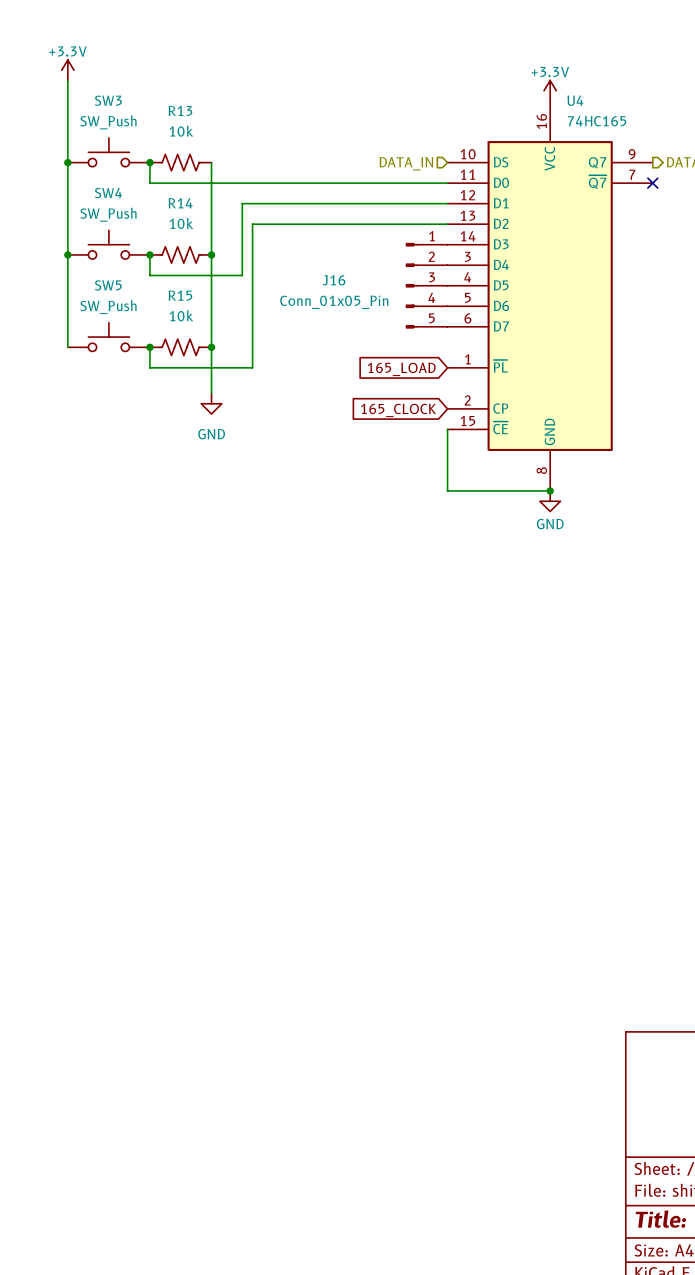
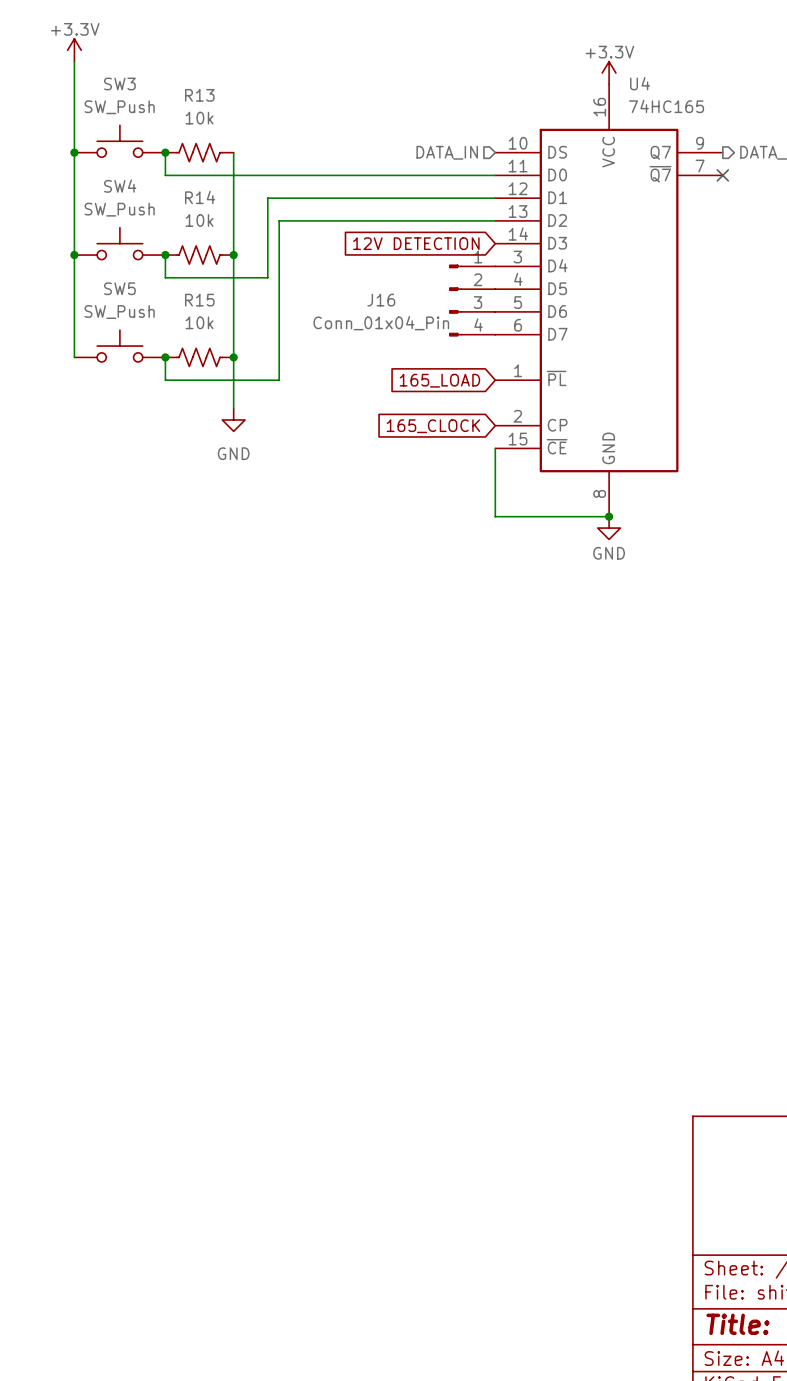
J16 symbol: [405, 243, 448, 329] -> [449, 264, 496, 337]
global label: none -> 12V DETECTION (416, 243)
J16 value: Conn_01x05_Pin (334, 302) -> Conn_01x04_Pin (381, 323)

